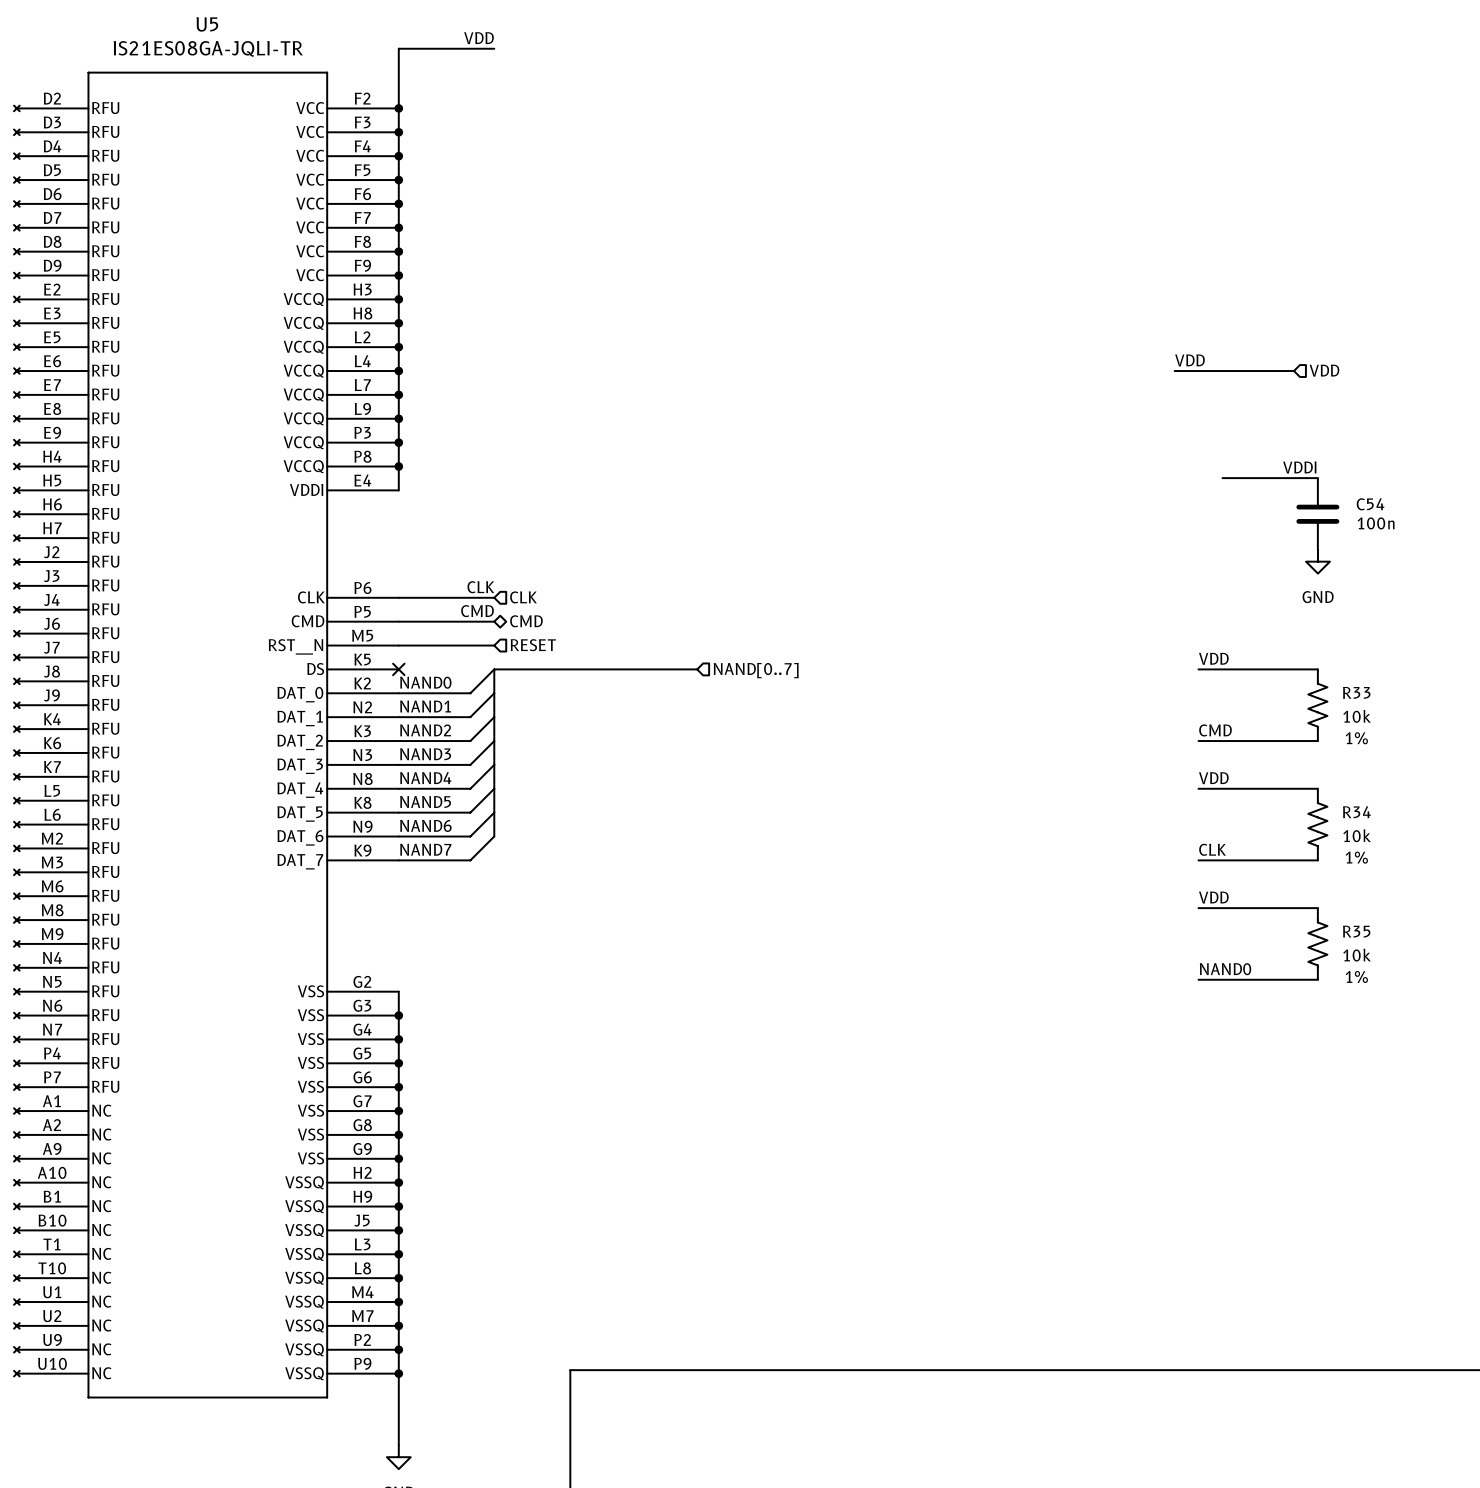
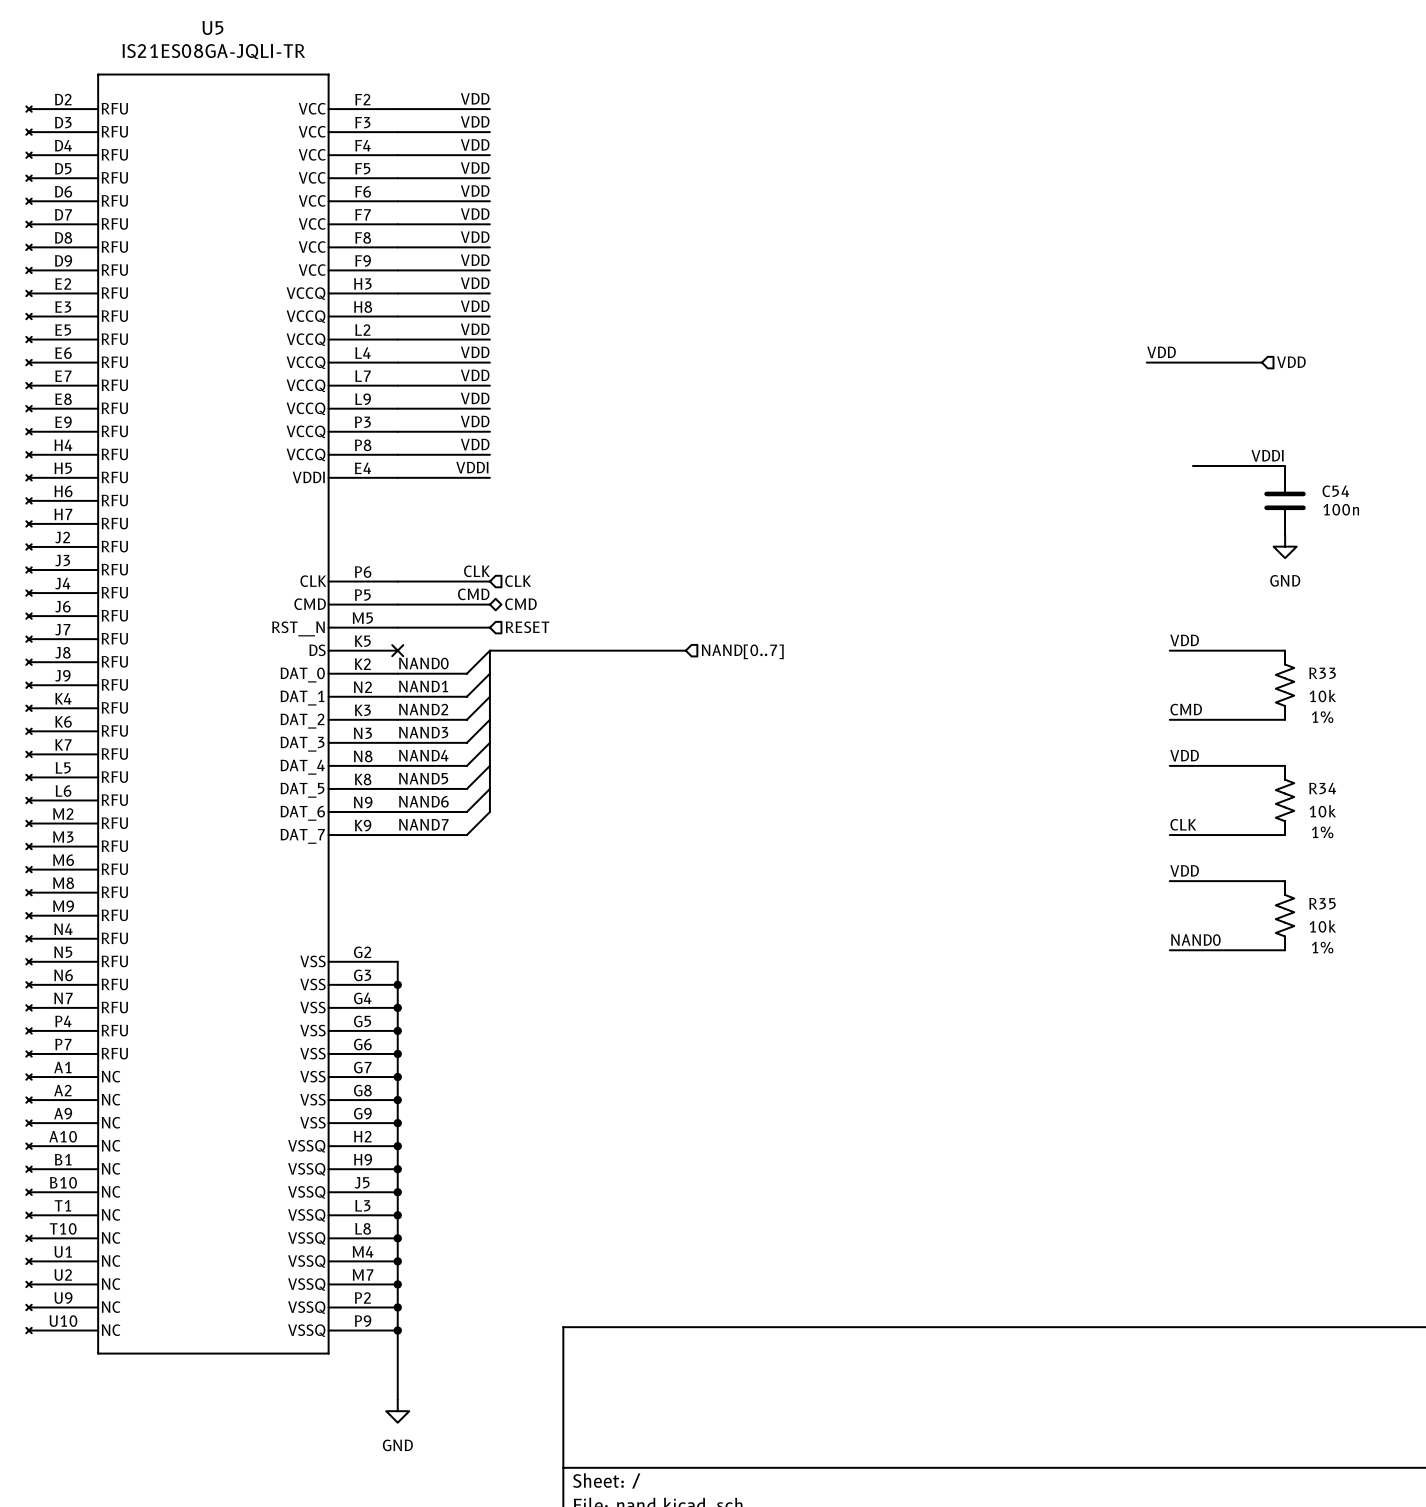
label: VDD (479, 38) -> none
wire: (494, 48) (398, 48) (398, 490) -> (489, 477) (397, 477)
label: none -> VDD (475, 98)
wire: none -> (397, 109) (489, 109)
junction: (398, 108) -> none
label: none -> VDD (475, 121)
wire: none -> (397, 132) (489, 132)
junction: (398, 132) -> none
label: none -> VDD (475, 144)
wire: none -> (397, 155) (489, 155)
junction: (398, 156) -> none
label: none -> VDD (475, 168)
wire: none -> (397, 178) (489, 178)
junction: (398, 180) -> none
label: none -> VDD (475, 191)
wire: none -> (397, 201) (489, 201)
junction: (398, 203) -> none
label: none -> VDD (475, 214)
wire: none -> (397, 224) (489, 224)
junction: (398, 227) -> none
label: none -> VDD (475, 237)
wire: none -> (397, 247) (489, 247)
junction: (398, 251) -> none
label: none -> VDD (475, 260)
wire: none -> (397, 270) (489, 270)
junction: (398, 275) -> none
label: none -> VDD (475, 283)
wire: none -> (397, 293) (489, 293)
junction: (398, 299) -> none
label: none -> VDD (475, 306)
wire: none -> (397, 316) (489, 316)
junction: (398, 323) -> none
label: none -> VDD (475, 329)
wire: none -> (397, 339) (489, 339)
junction: (398, 347) -> none
label: none -> VDD (475, 352)
wire: none -> (397, 362) (489, 362)
junction: (398, 371) -> none
label: none -> VDD (475, 375)
wire: none -> (397, 385) (489, 385)
junction: (398, 394) -> none
label: none -> VDD (475, 398)
wire: none -> (397, 408) (489, 408)
junction: (398, 418) -> none
label: none -> VDD (475, 421)
wire: none -> (397, 431) (489, 431)
junction: (398, 442) -> none
label: none -> VDD (475, 444)
wire: none -> (397, 454) (489, 454)
junction: (398, 466) -> none
label: none -> VDDI (472, 467)

